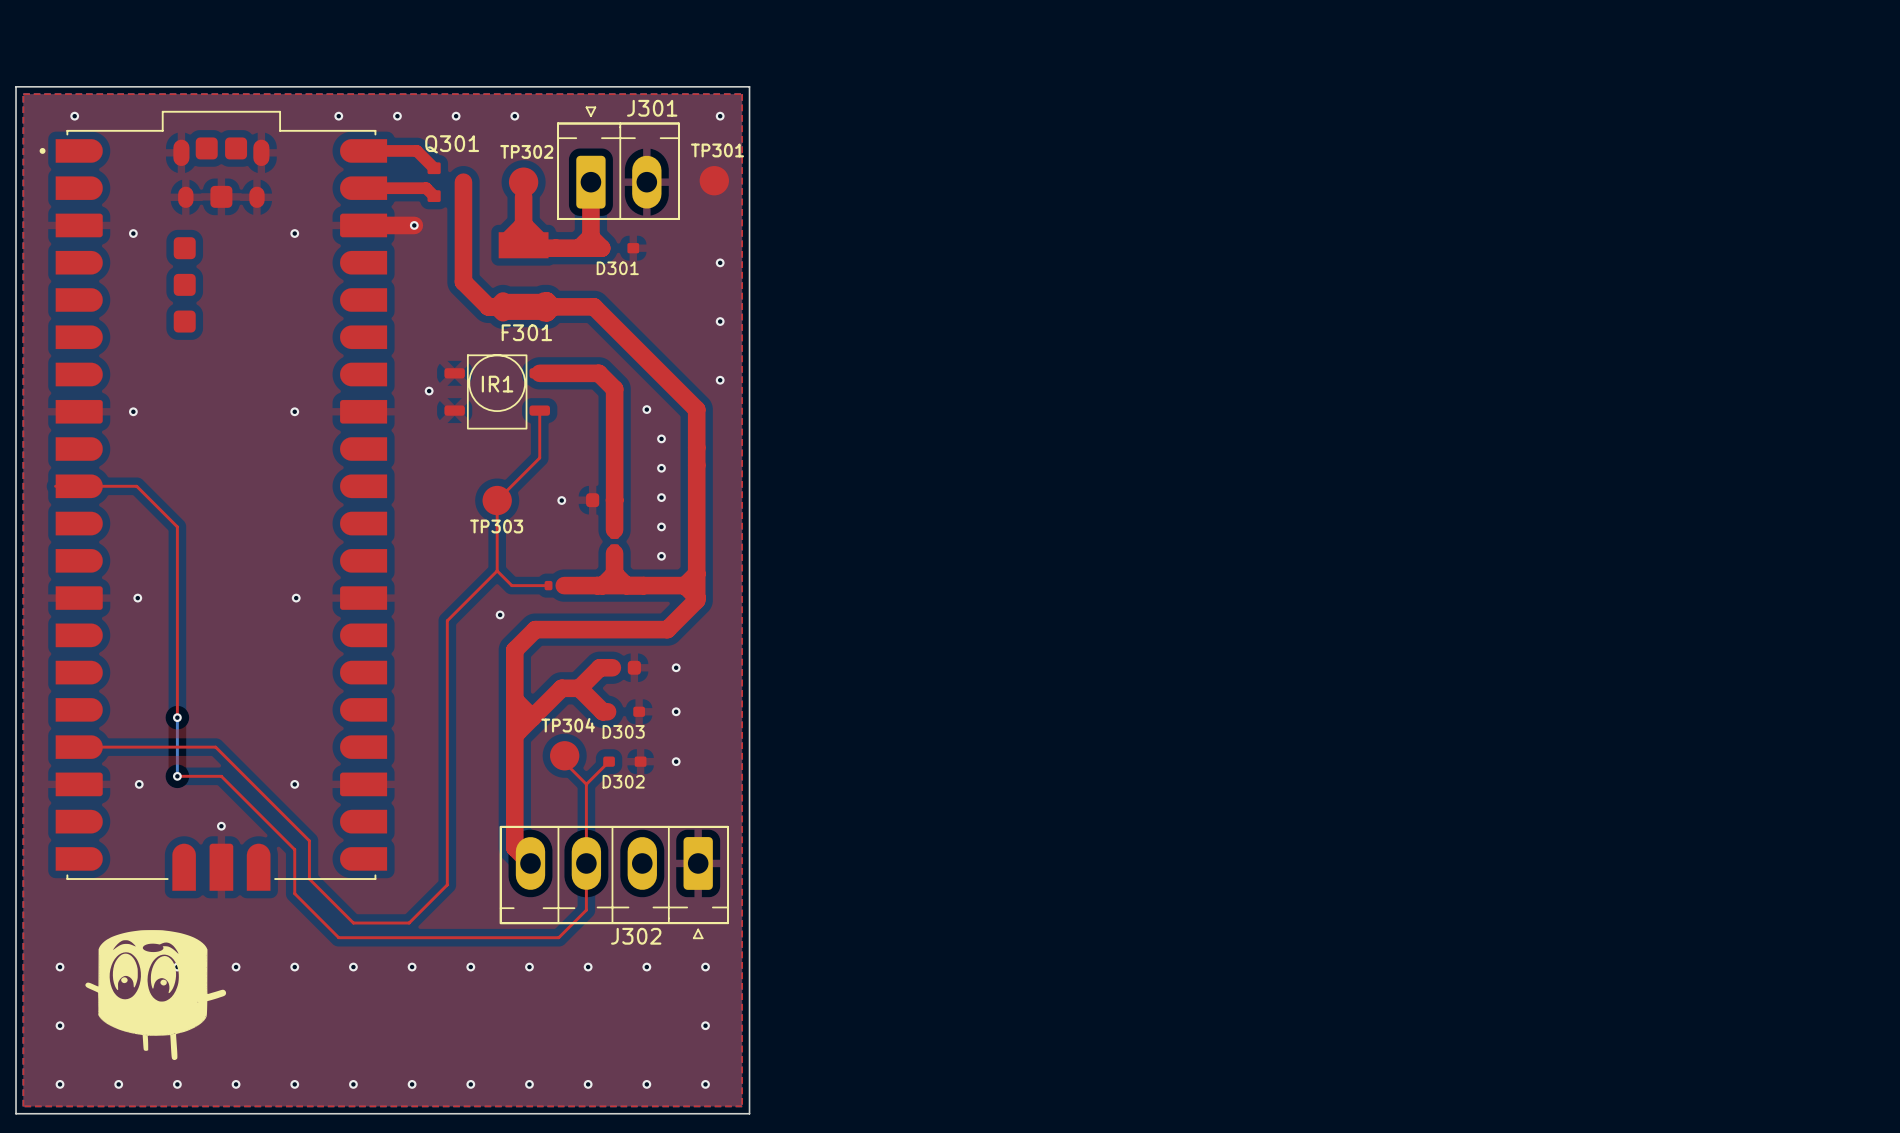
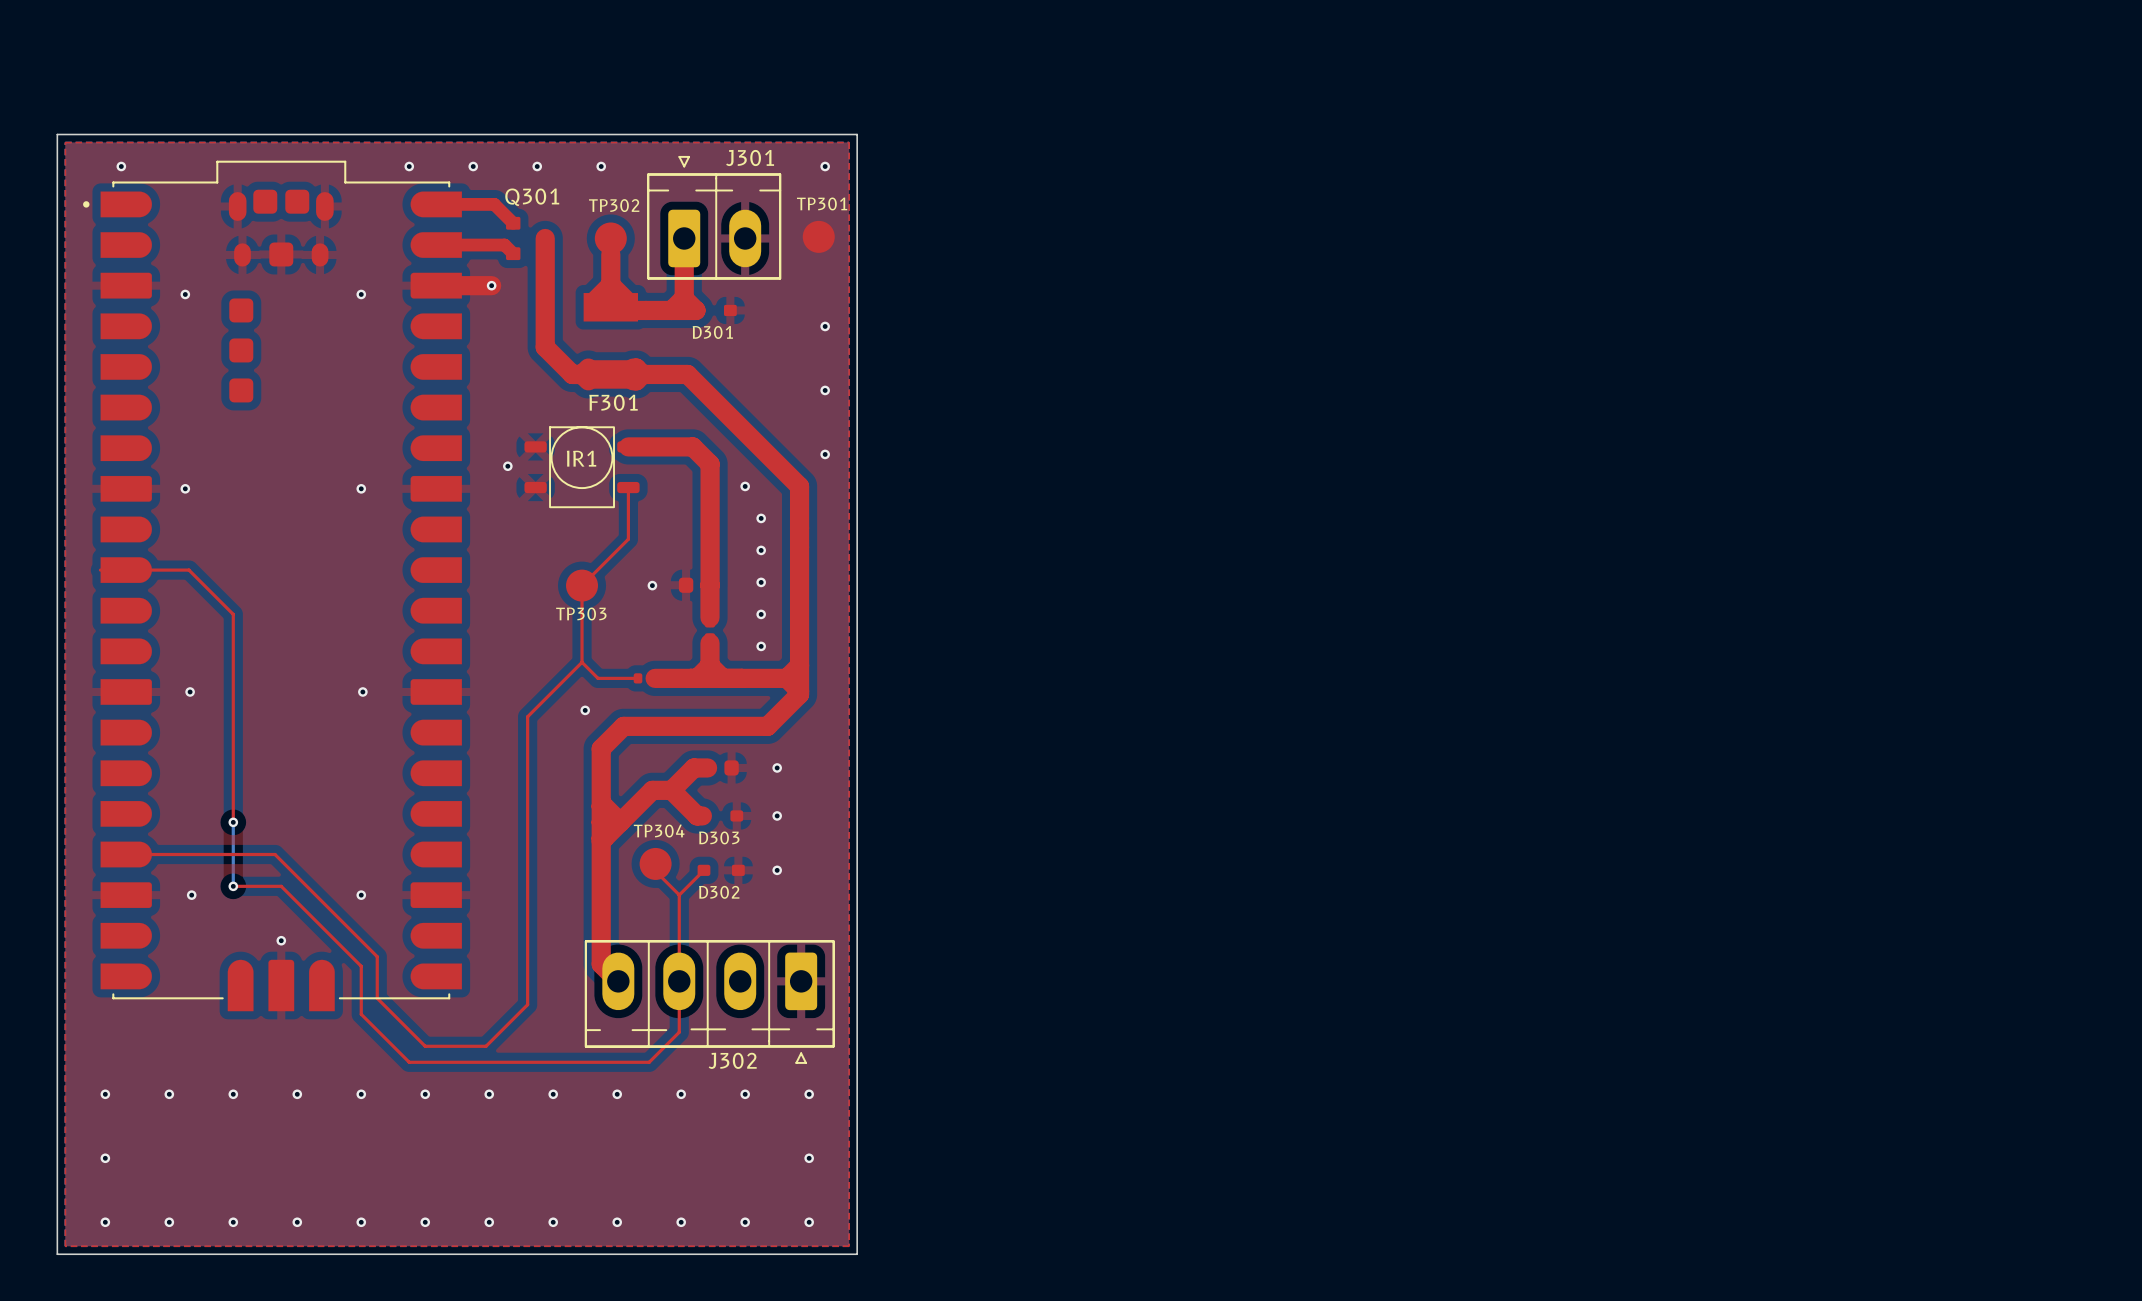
drawing: [85, 930, 227, 1061] -> none

